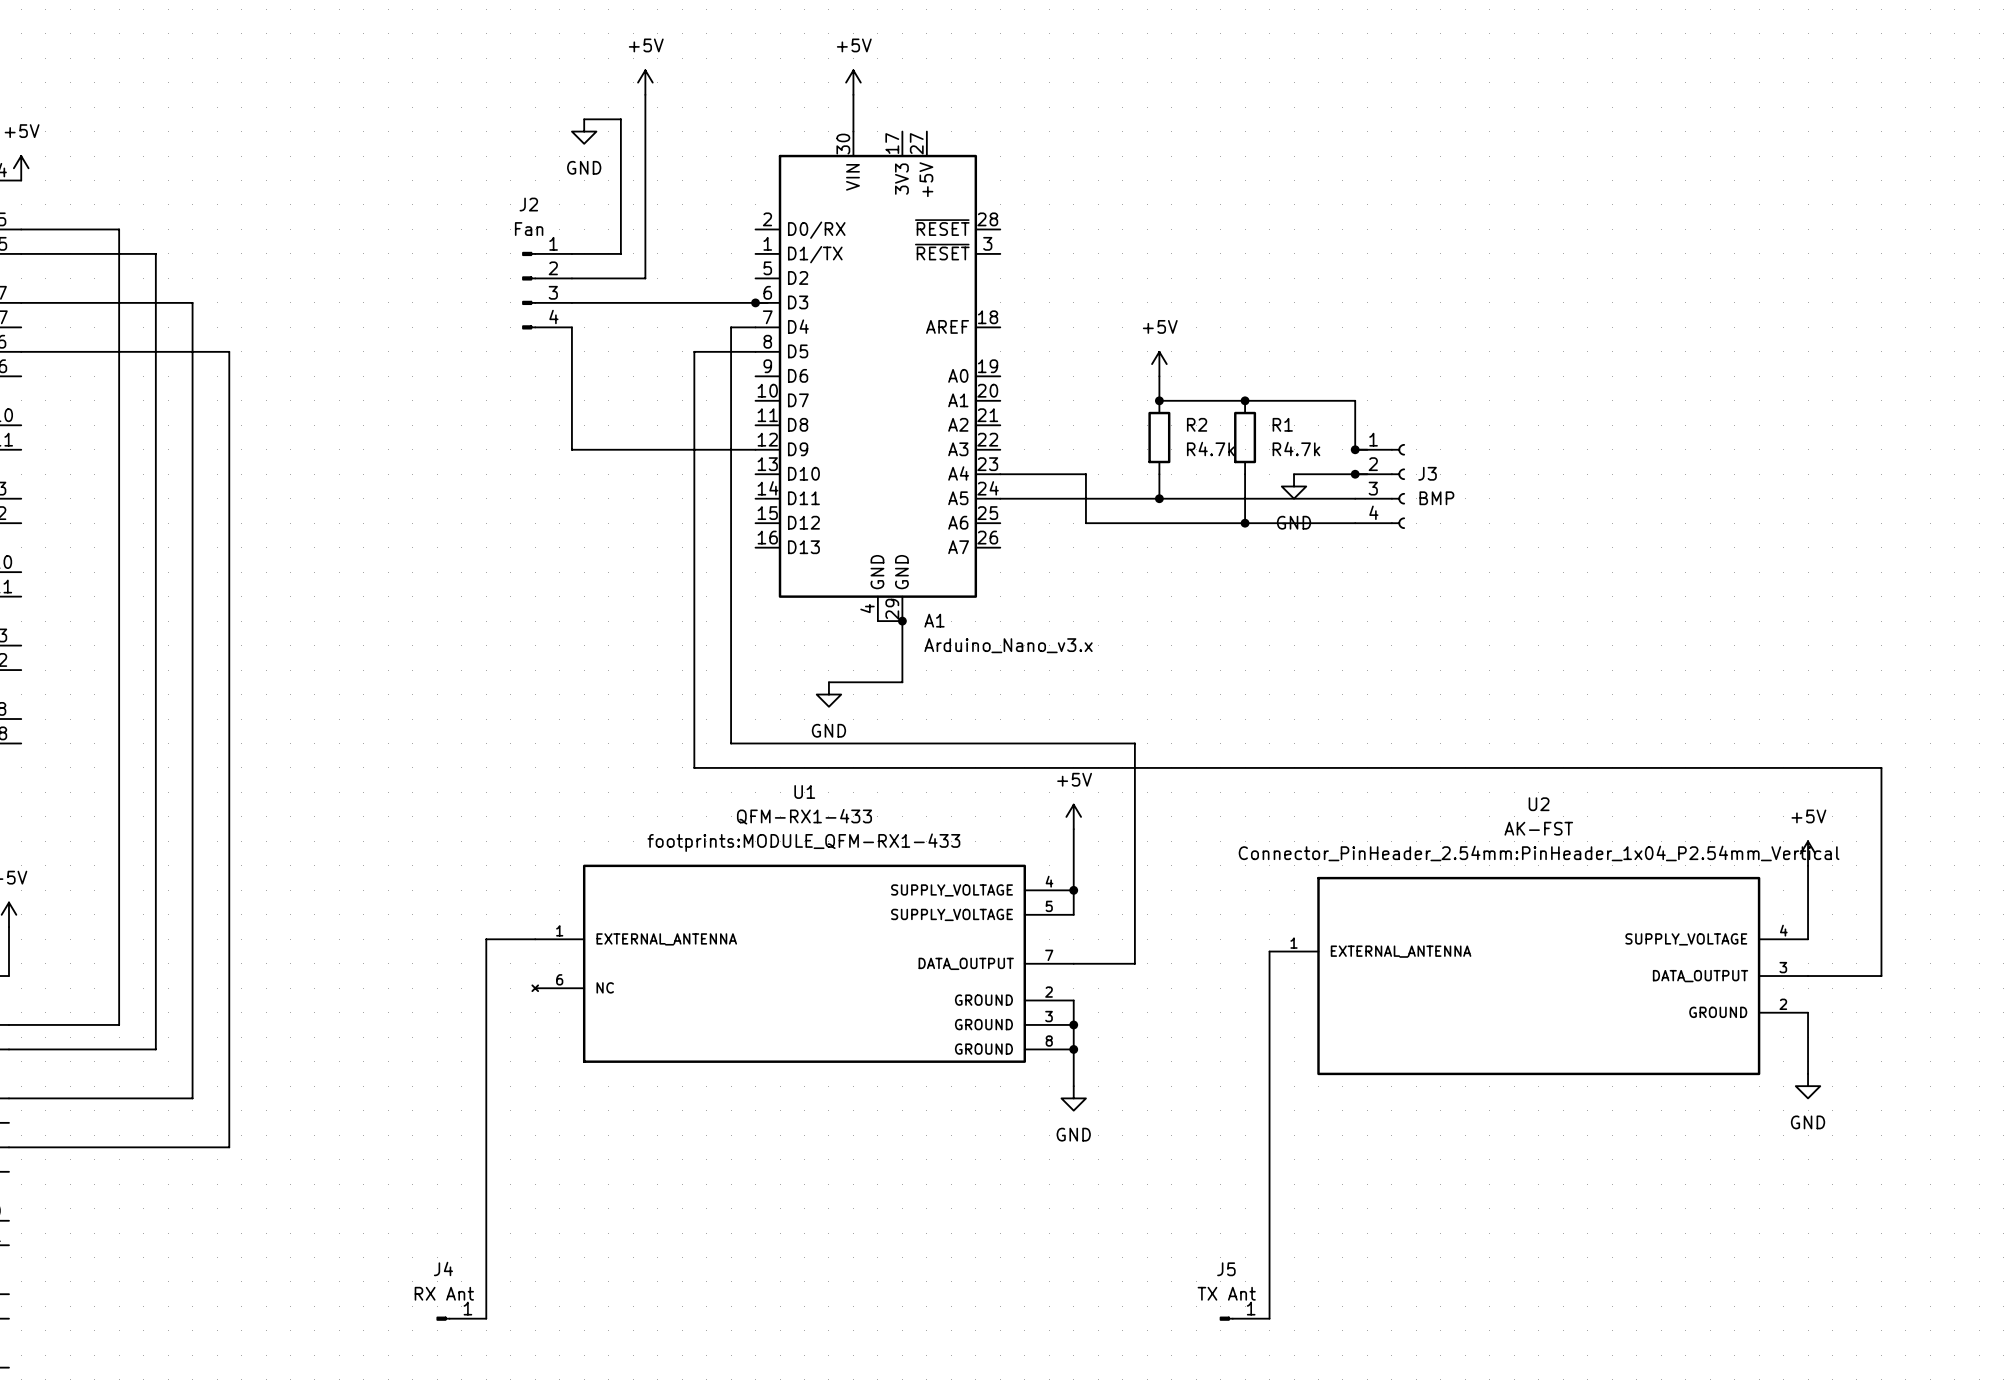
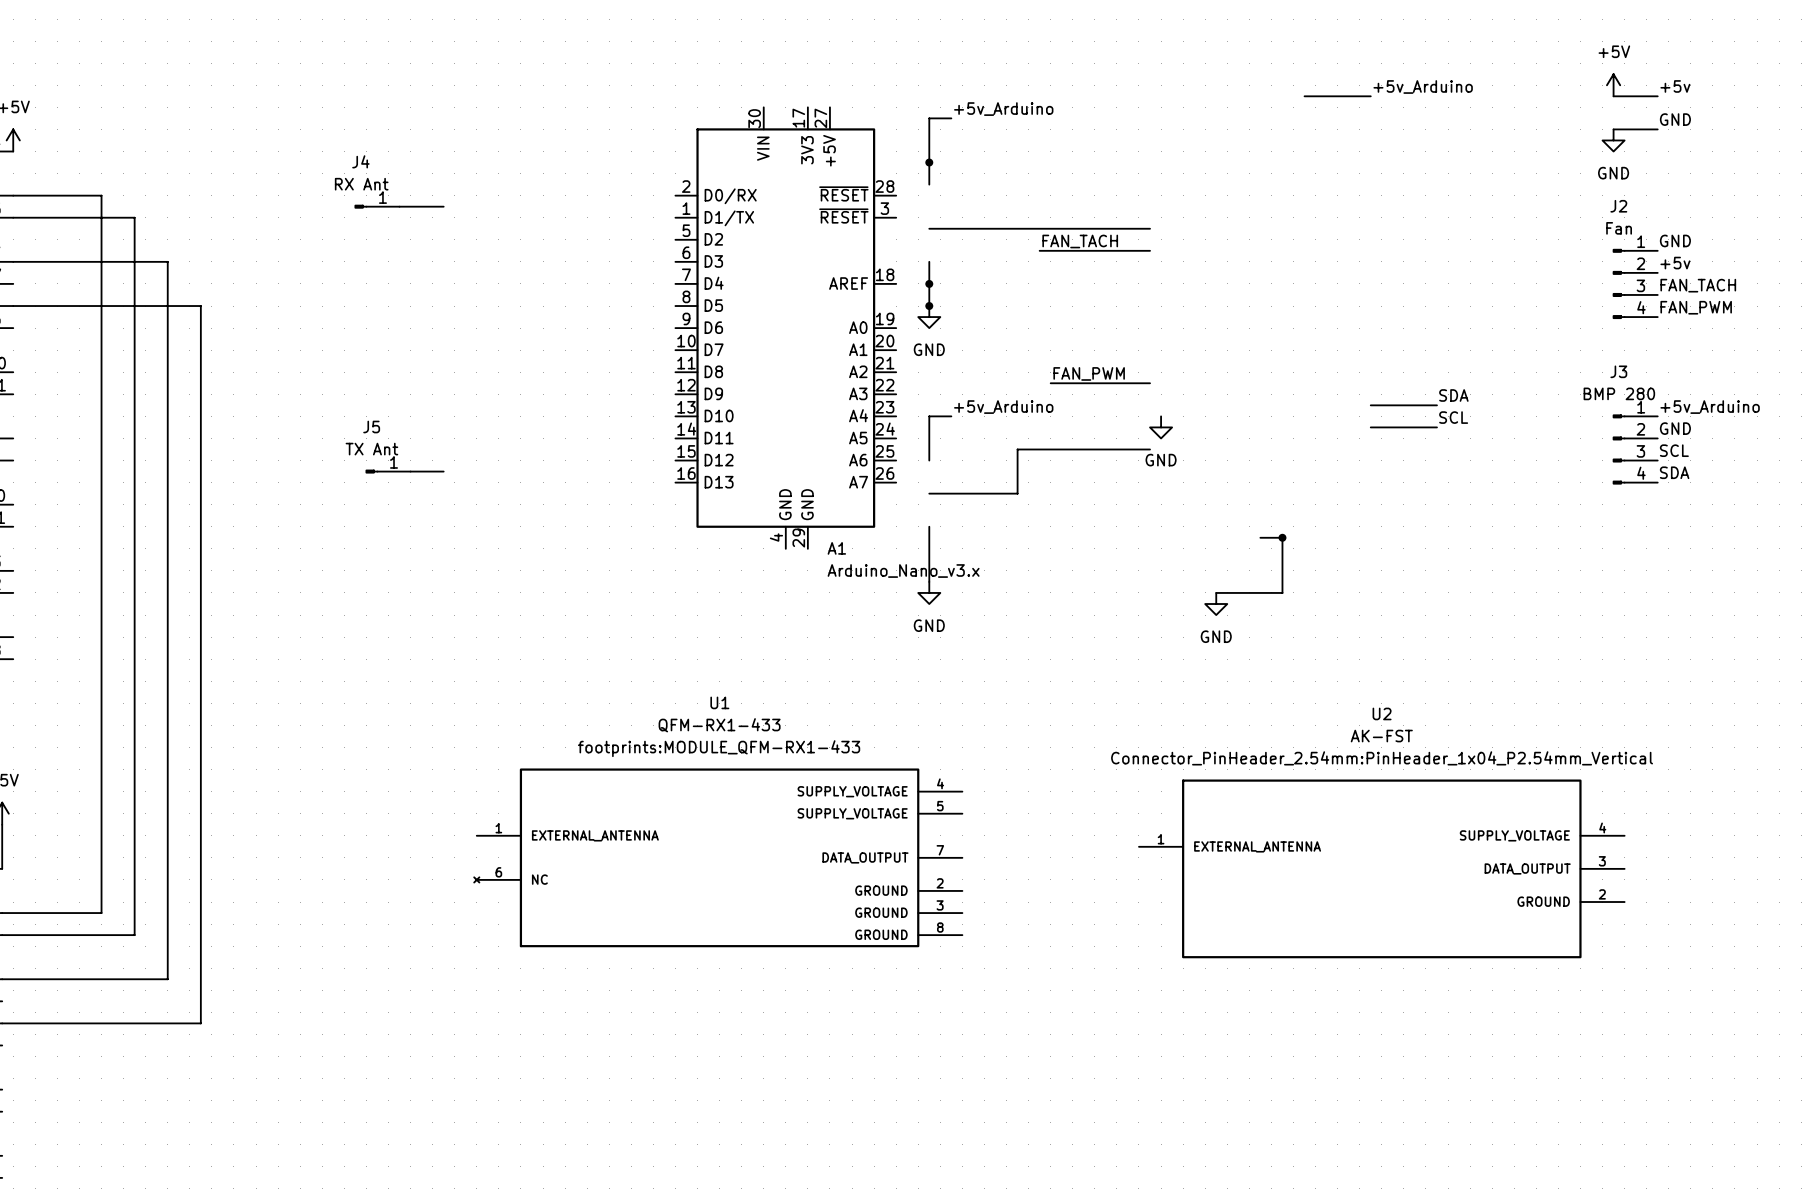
power symbol: +5V (645, 82) -> none
power symbol: +5V (853, 82) -> none
wire: (645, 94) (645, 278) (571, 278) -> none
wire: (853, 94) (853, 131) -> none
power symbol: none -> +5V (1613, 85)
label: none -> +5v_Arduino (1423, 86)
label: none -> +5v (1675, 86)
wire: (584, 119) (620, 119) (620, 253) (571, 253) -> none
wire: none -> (1304, 96) (1370, 96)
wire: none -> (1613, 96) (1657, 96)
power symbol: GND (584, 131) -> none
label: none -> +5v_Arduino (1003, 109)
wire: none -> (951, 118) (929, 118) (929, 184)
label: none -> GND (1675, 119)
wire: none -> (1613, 129) (1657, 129)
power symbol: none -> GND (1613, 140)
junction: none -> (929, 162)
wire: none -> (399, 206) (443, 206)
wire: none -> (929, 228) (1150, 228)
label: none -> GND (1675, 240)
label: none -> FAN_TACH (1080, 241)
J2 position: (547, 290) -> (1635, 283)
wire: none -> (1039, 250) (1150, 250)
wire: (571, 302) (767, 302) -> none
junction: (755, 302) -> none
wire: none -> (929, 261) (929, 306)
label: none -> +5v (1675, 263)
wire: (571, 327) (571, 449) (755, 449) -> none
wire: (755, 327) (731, 327) (731, 743) (1134, 743) (1134, 963) (1073, 963) -> none
junction: none -> (929, 283)
label: none -> FAN_TACH (1698, 285)
wire: (755, 351) (694, 351) (694, 767) (1881, 767) (1881, 976) (1808, 976) -> none
junction: none -> (929, 306)
label: none -> FAN_PWM (1696, 307)
power symbol: none -> GND (929, 317)
power symbol: +5V (1159, 364) -> none
wire: (1159, 376) (1159, 400) (1355, 400) (1355, 449) (1367, 449) -> none
junction: (1159, 400) -> none
junction: (1245, 400) -> none
label: none -> FAN_PWM (1089, 373)
R2: R4.7k (1159, 437) -> none
wire: none -> (1050, 383) (1150, 383)
R1: R4.7k (1245, 437) -> none
J3 symbol: [1355, 444, 1405, 529] -> [1612, 414, 1658, 485]
junction: (1355, 449) -> none
label: none -> SDA (1453, 395)
label: none -> +5v_Arduino (1003, 407)
label: none -> +5v_Arduino (1710, 407)
J3 name position: J3 (1427, 473) -> J3 (1618, 371)
wire: (1000, 474) (1037, 474) -> (929, 460) (929, 416)
wire: (1061, 474) (1085, 474) (1085, 523) (1355, 523) -> none
wire: (1159, 474) (1159, 498) -> none
wire: (1245, 474) (1245, 523) -> none
wire: (1294, 474) (1367, 474) -> (1370, 405) (1436, 405)
junction: (1355, 474) -> none
label: none -> SCL (1453, 417)
wire: none -> (1370, 427) (1436, 427)
label: none -> GND (1675, 428)
wire: (1000, 498) (1355, 498) -> none
junction: (1159, 498) -> none
J3 value: BMP (1436, 498) -> BMP 280 (1619, 393)
wire: none -> (1150, 449) (1017, 449) (1017, 493) (929, 493)
label: none -> SCL (1674, 450)
junction: (1245, 523) -> none
wire: none -> (410, 471) (443, 471)
label: none -> SDA (1674, 472)
wire: none -> (929, 526) (929, 581)
wire: none -> (1260, 537) (1282, 537) (1282, 592) (1216, 592)
junction: none -> (1282, 537)
wire: (877, 621) (902, 621) (902, 682) (828, 682) -> none
junction: (902, 621) -> none
power symbol: none -> GND (929, 592)
power symbol: none -> GND (1216, 604)
power symbol: GND (828, 694) -> none
power symbol: +5V (1073, 816) -> none
wire: (1073, 829) (1073, 914) -> none
power symbol: +5V (1808, 853) -> none
wire: (1808, 865) (1808, 939) -> none
junction: (1073, 890) -> none
wire: (535, 939) (486, 939) (486, 1318) -> none
wire: (1269, 951) (1269, 1318) -> none
wire: (1073, 1000) (1073, 1086) -> none
wire: (1808, 1012) (1808, 1073) -> none
junction: (1073, 1024) -> none
junction: (1073, 1049) -> none
power symbol: GND (1808, 1086) -> none
power symbol: GND (1073, 1098) -> none
J4 position: (461, 1318) -> (377, 206)
J5 position: (1244, 1318) -> (388, 471)

